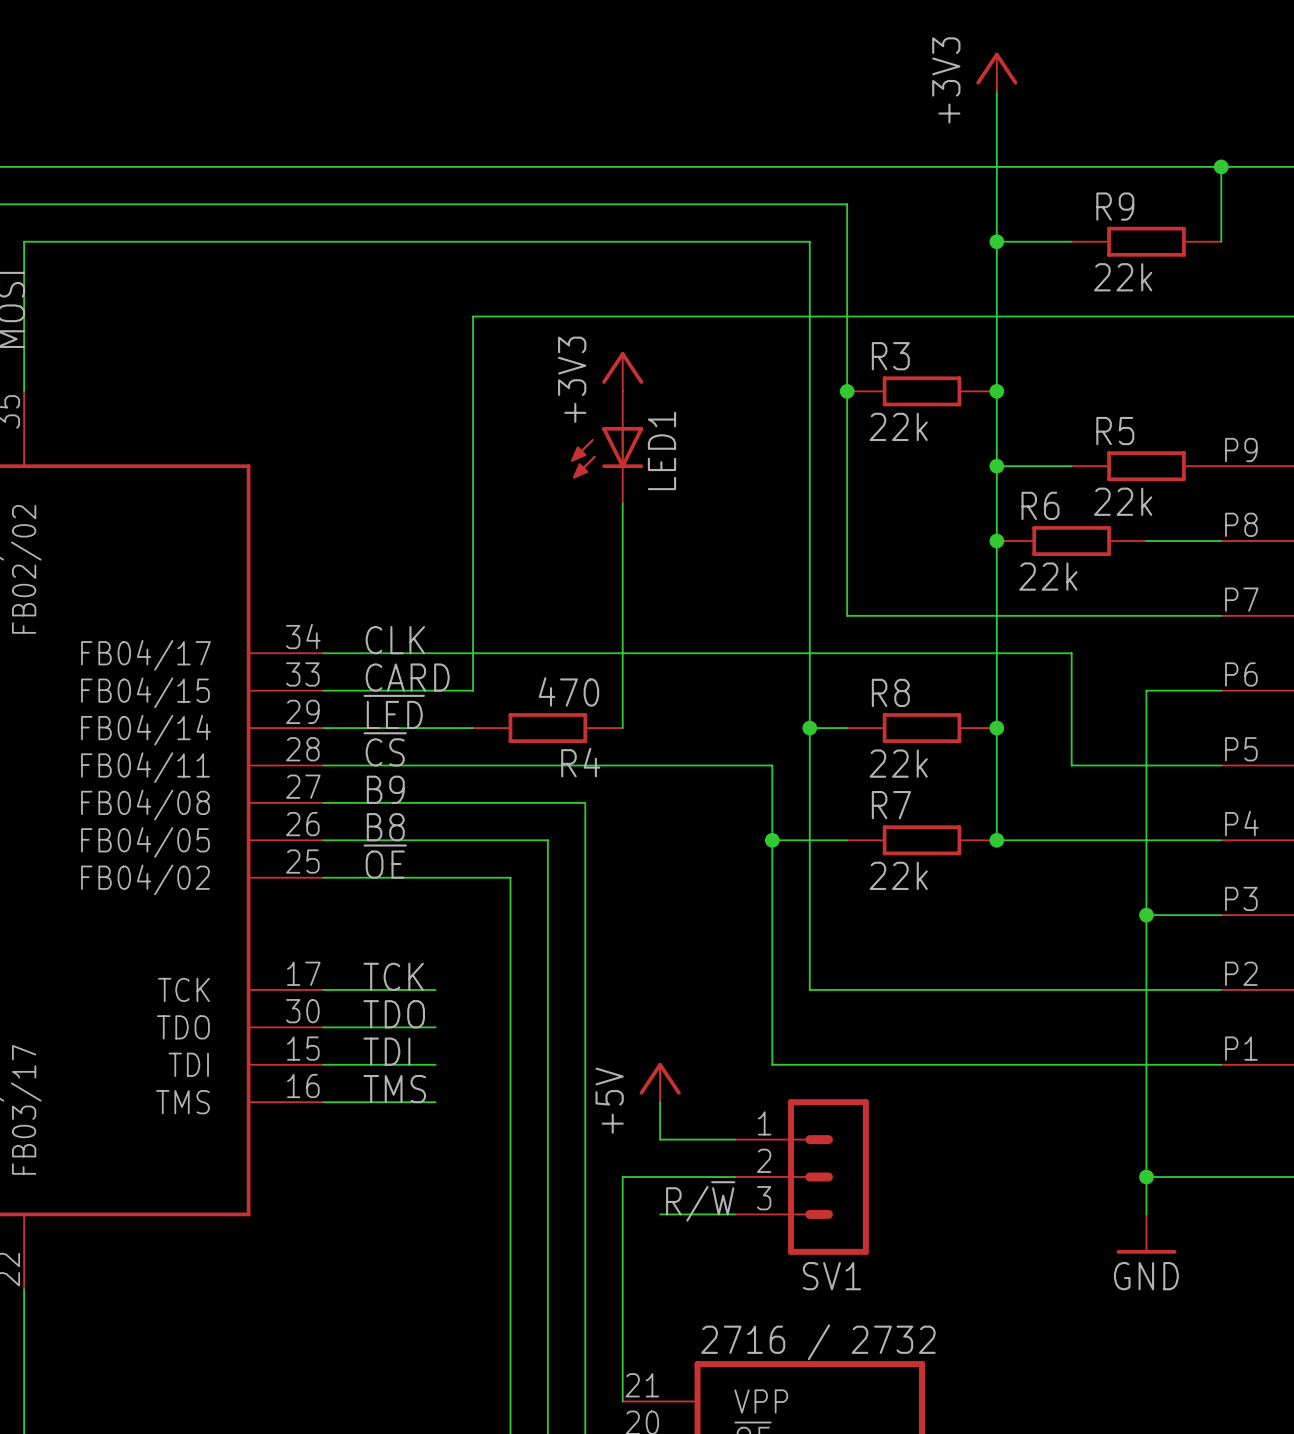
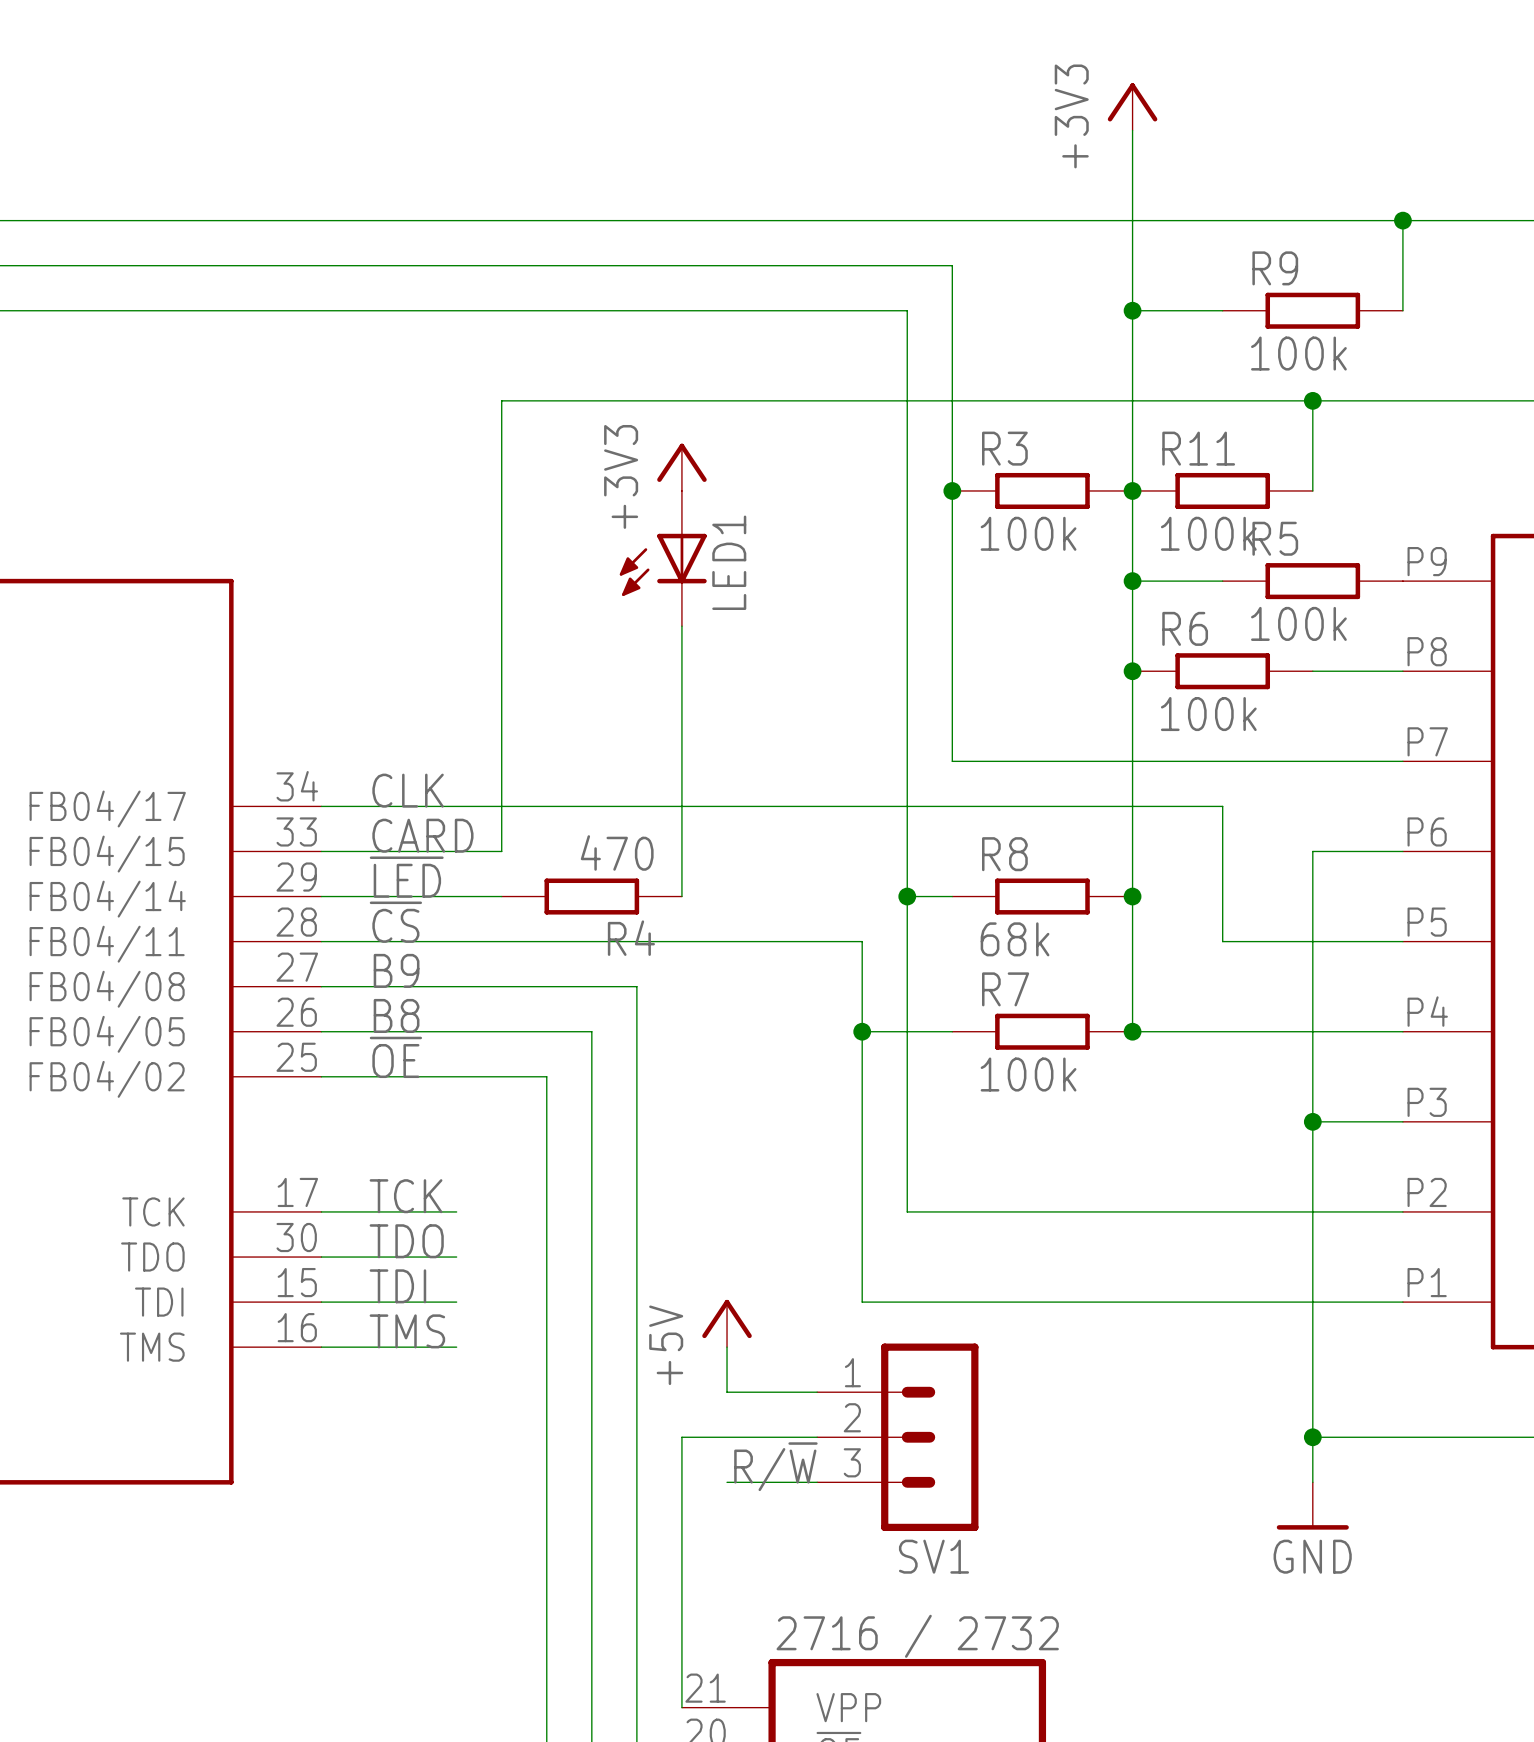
R9 value: 22k (1123, 277) -> 100k (1298, 353)
wire: none -> (1312, 400) (1312, 490)
junction: none -> (1312, 400)
R11: none -> 100k (1222, 490)
R3 value: 22k (898, 426) -> 100k (1028, 533)
R5 value: 22k (1123, 501) -> 100k (1298, 623)
R6 value: 22k (1048, 576) -> 100k (1208, 714)
R8 value: 22k (898, 763) -> 68k (1015, 939)
R7 value: 22k (898, 875) -> 100k (1028, 1074)

